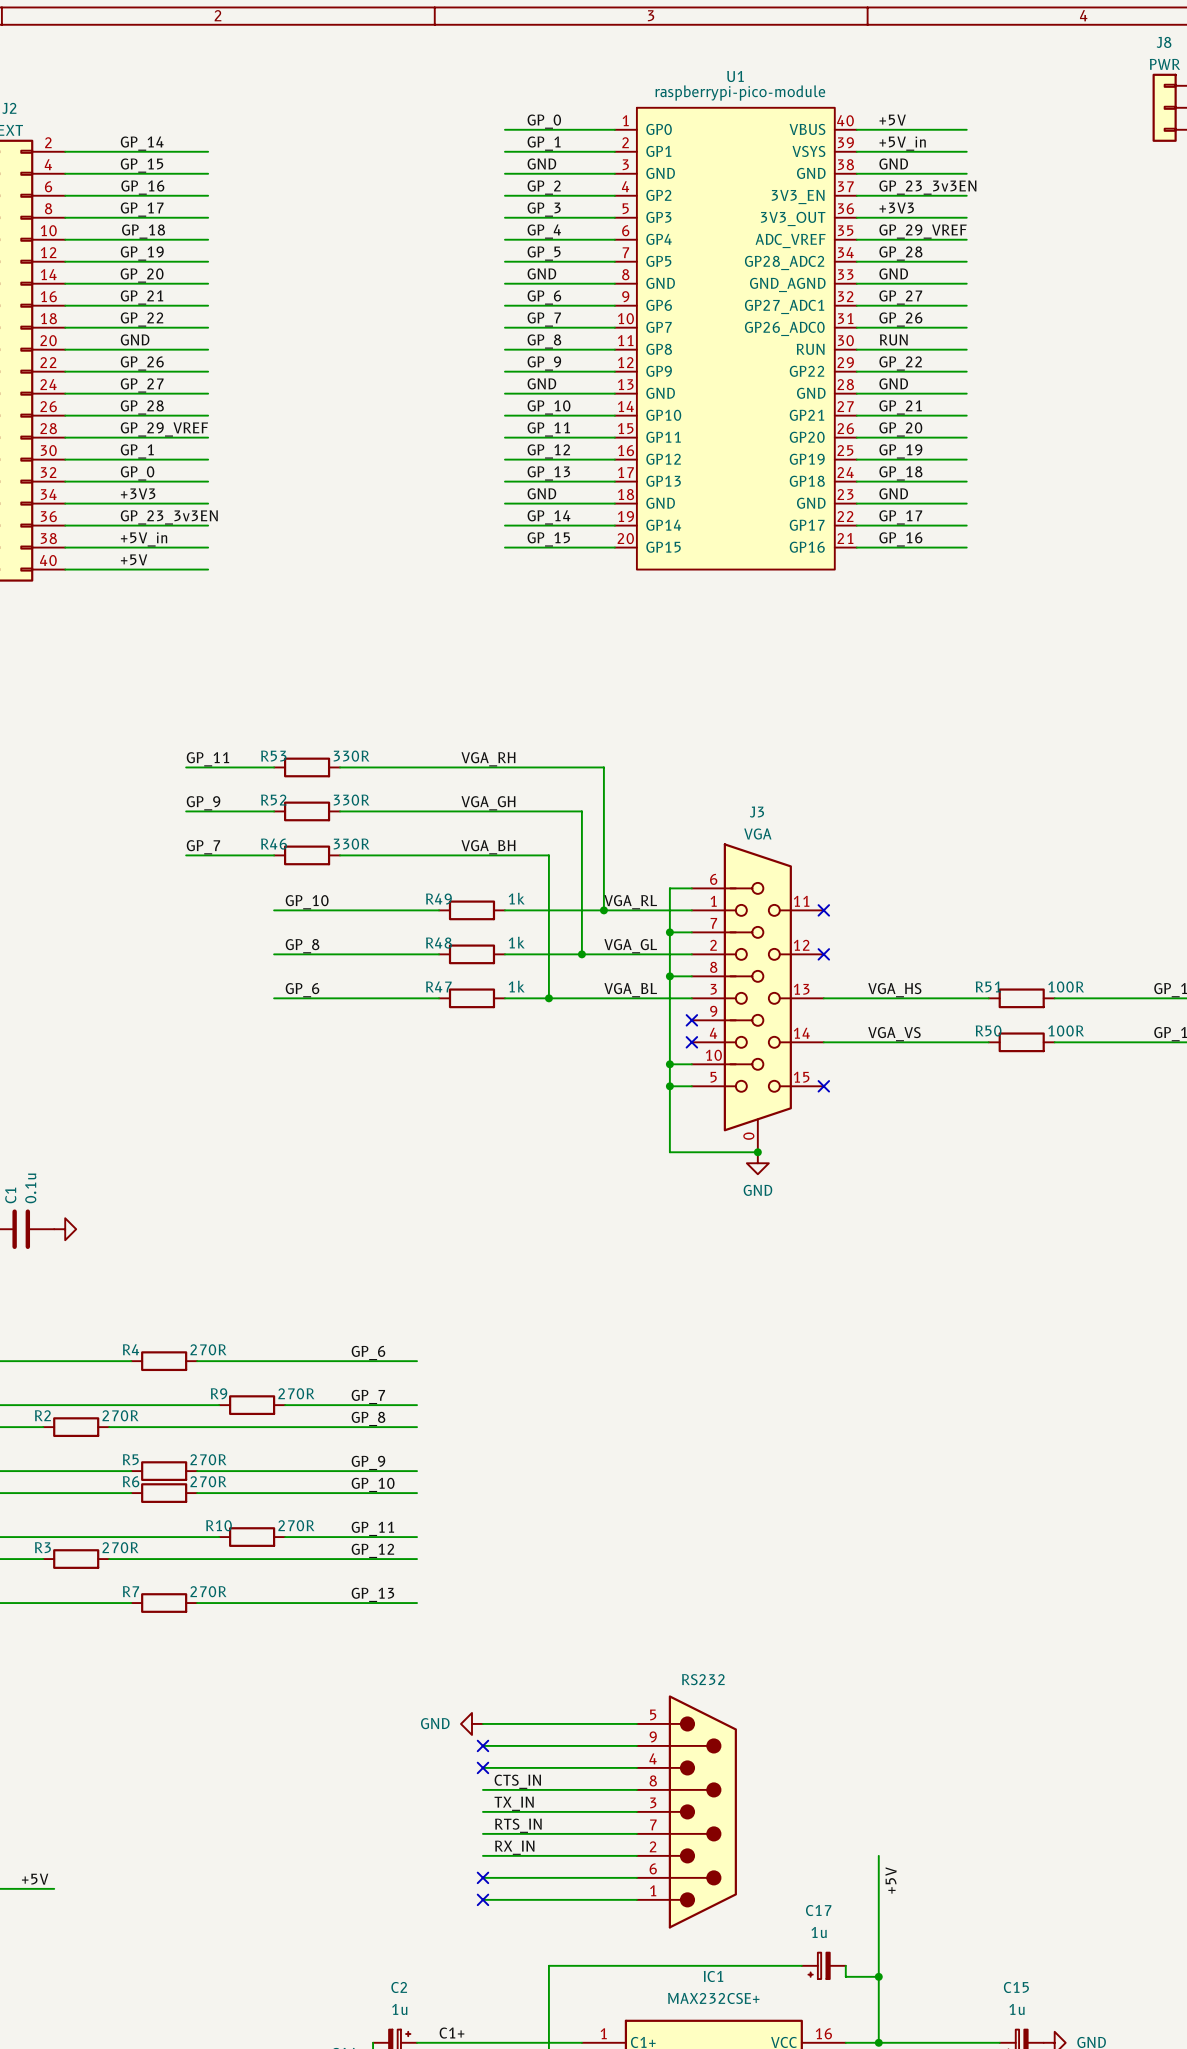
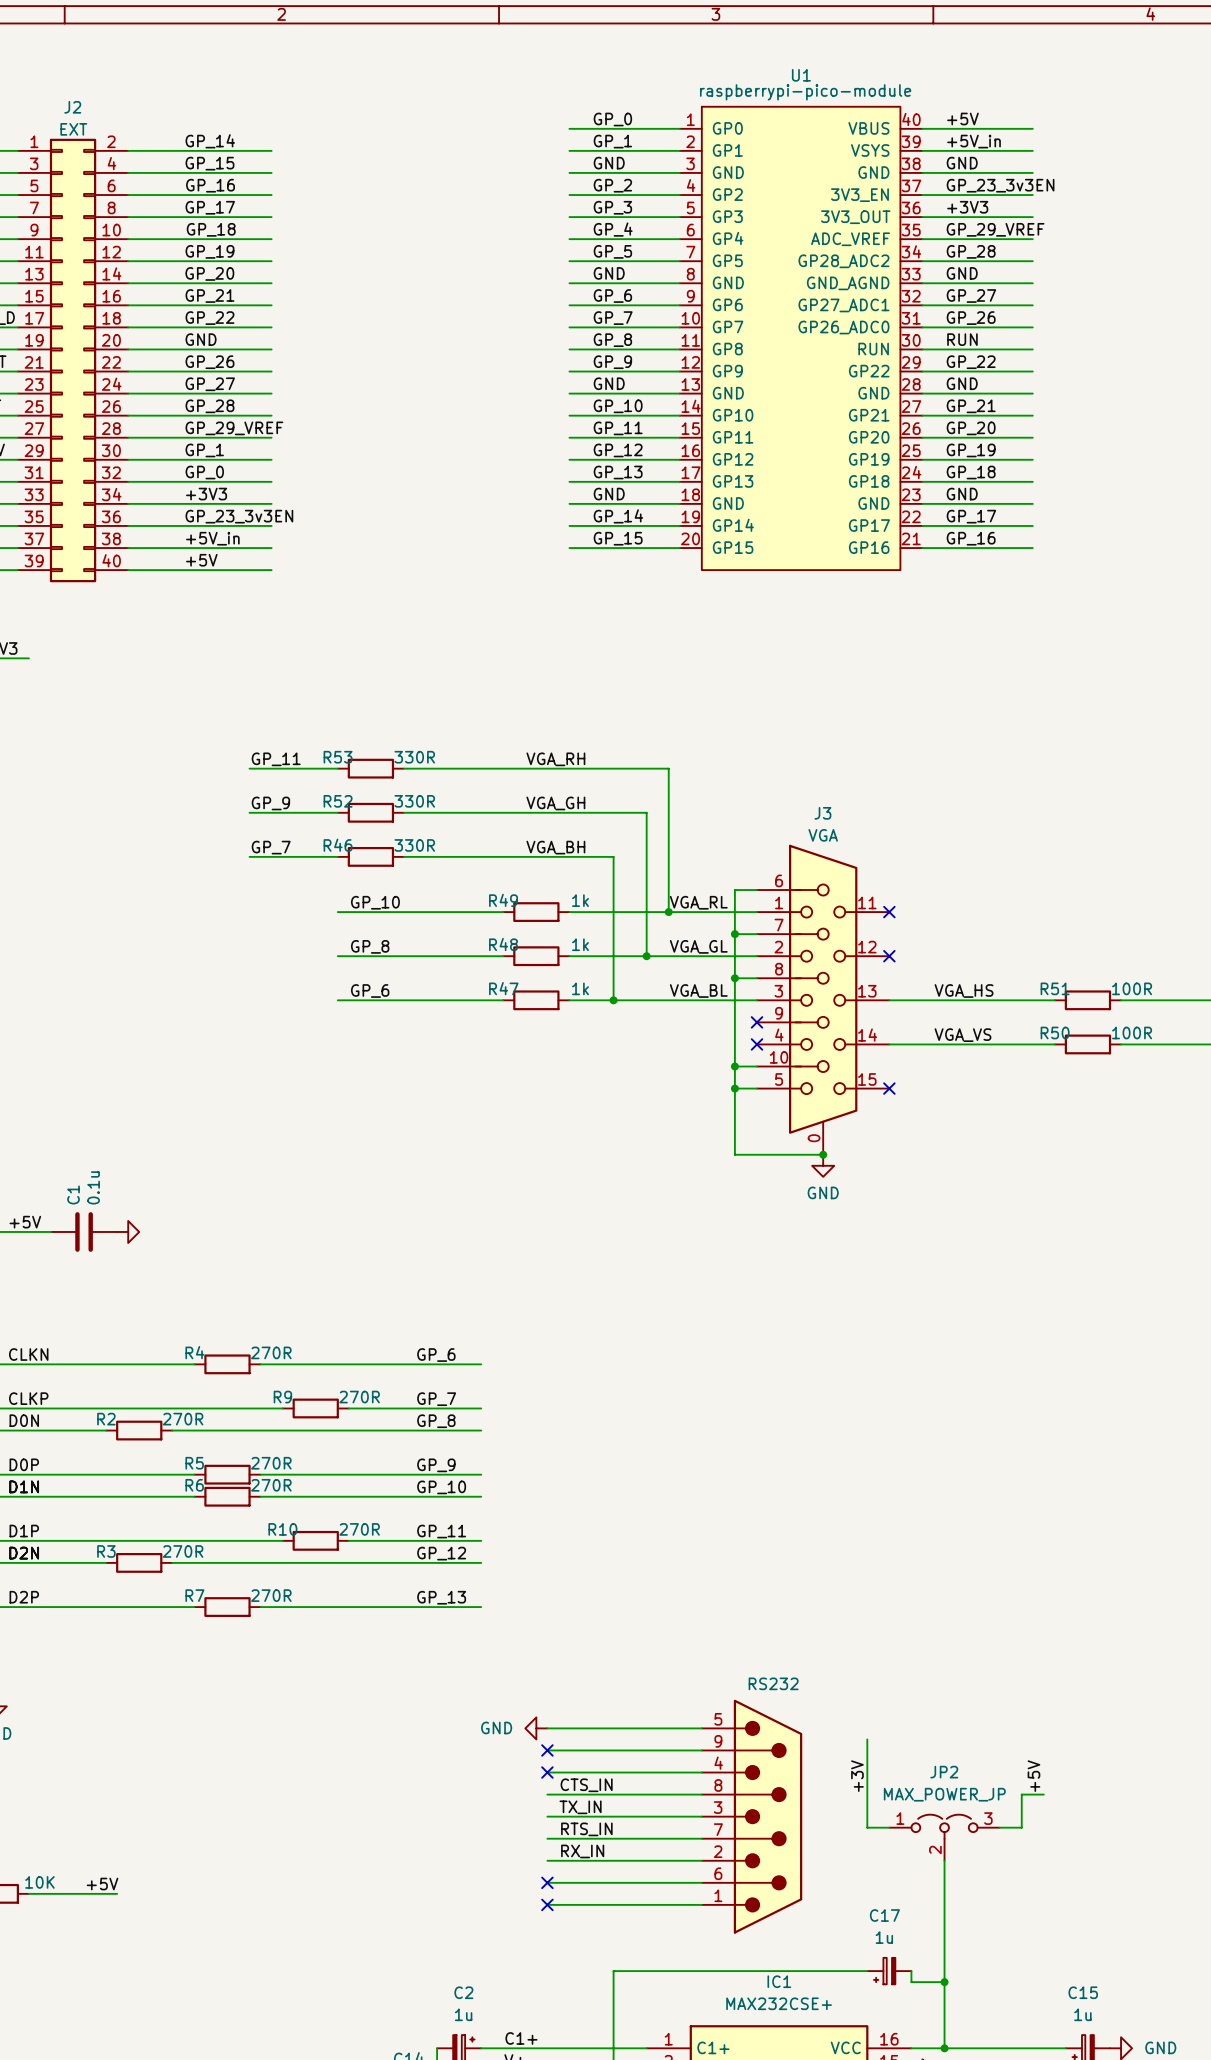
wire: none -> (867, 1739) (867, 1827) (889, 1827)
label: none -> +3V (857, 1776)
wire: none -> (1043, 1794) (1021, 1794) (1021, 1827) (999, 1827)
JP2: none -> MAX_POWER_JP (944, 1837)
label position: +5V (891, 1880) -> +5V (1033, 1776)

